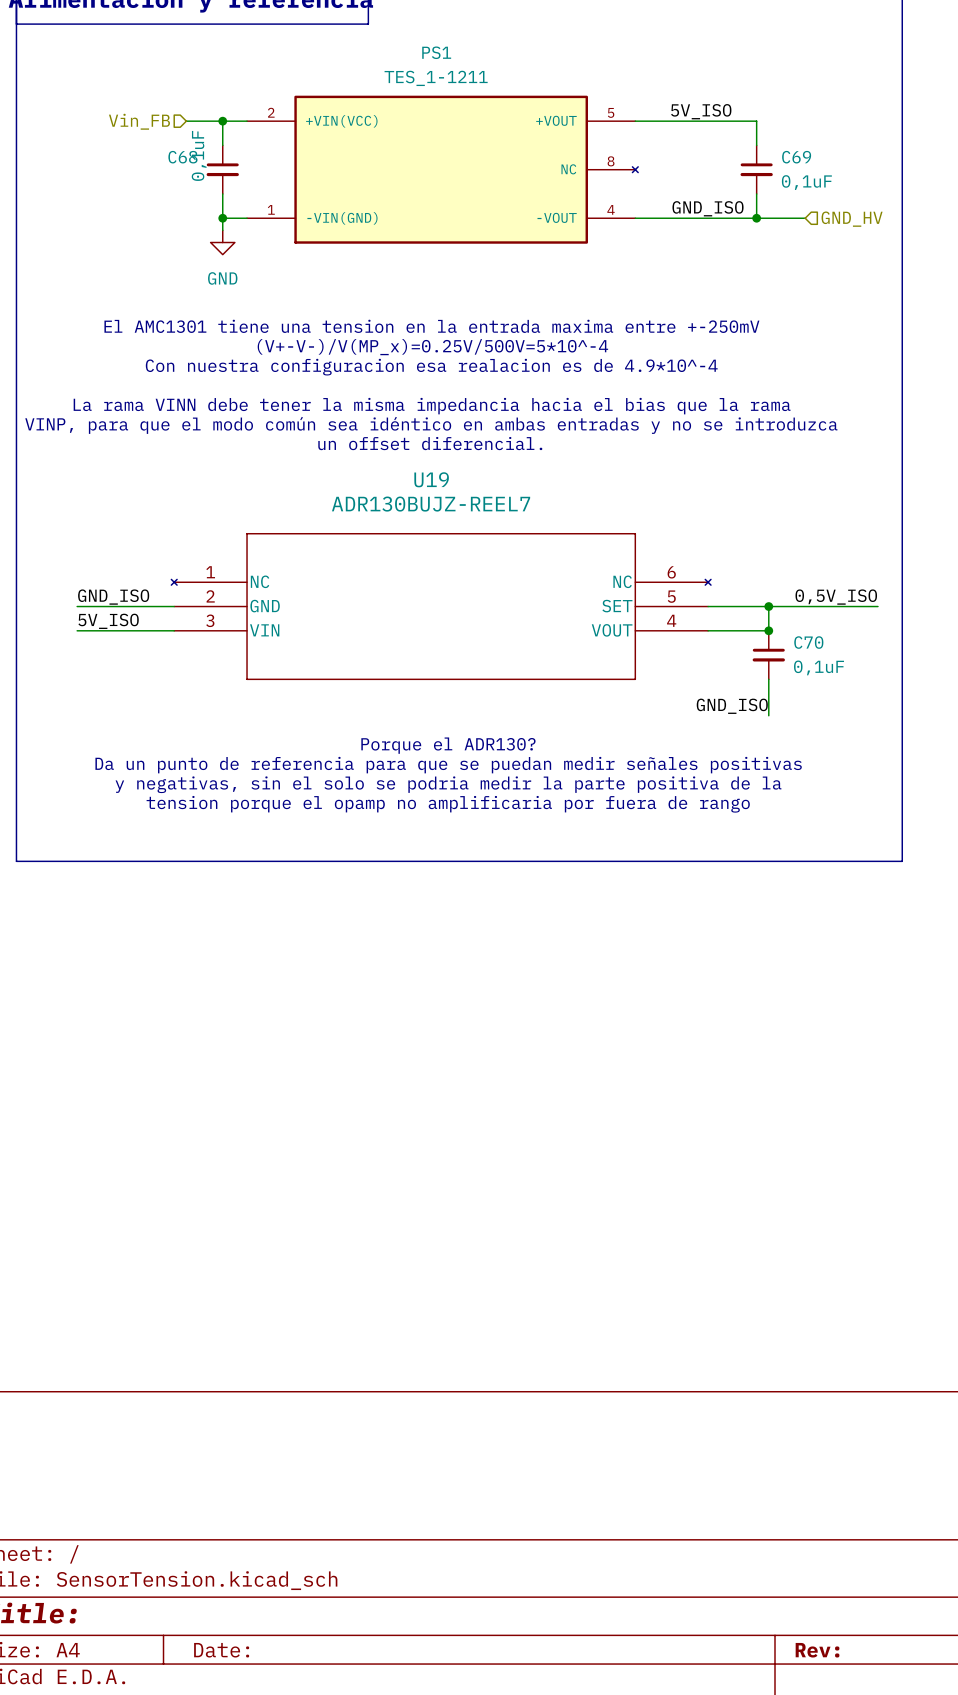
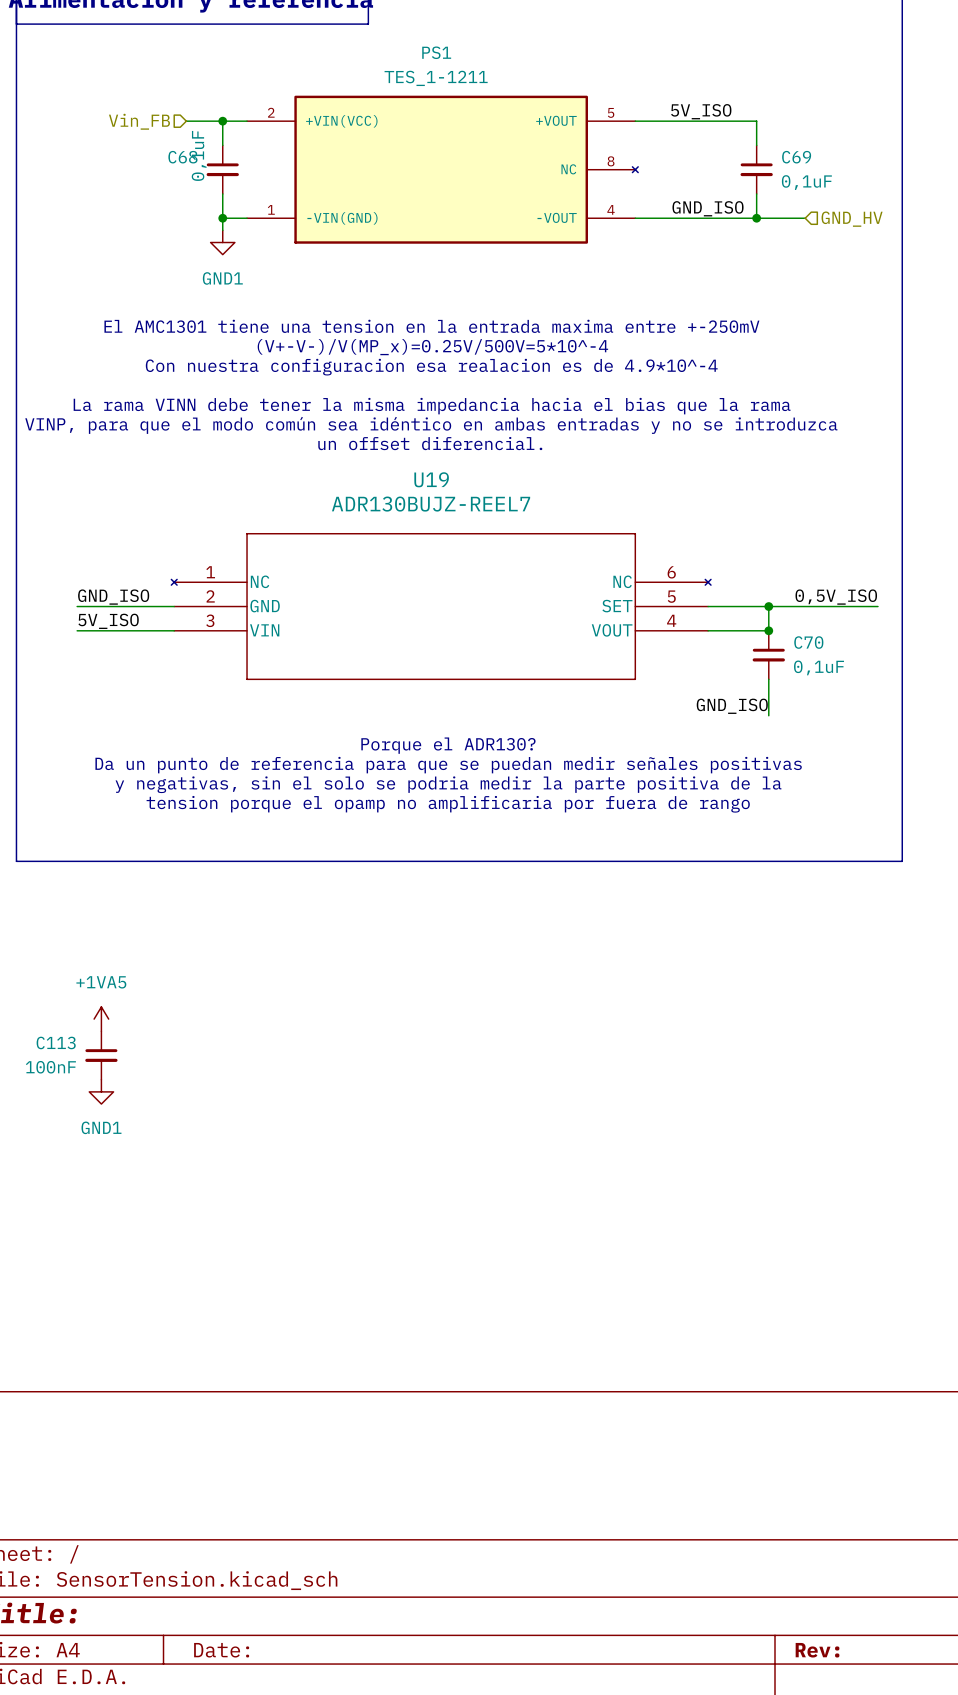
power symbol: GND (222, 242) -> GND1 (222, 242)
power symbol: none -> +1VA5 (101, 1019)
C113: none -> 100nF (101, 1055)
power symbol: none -> GND1 (101, 1091)

